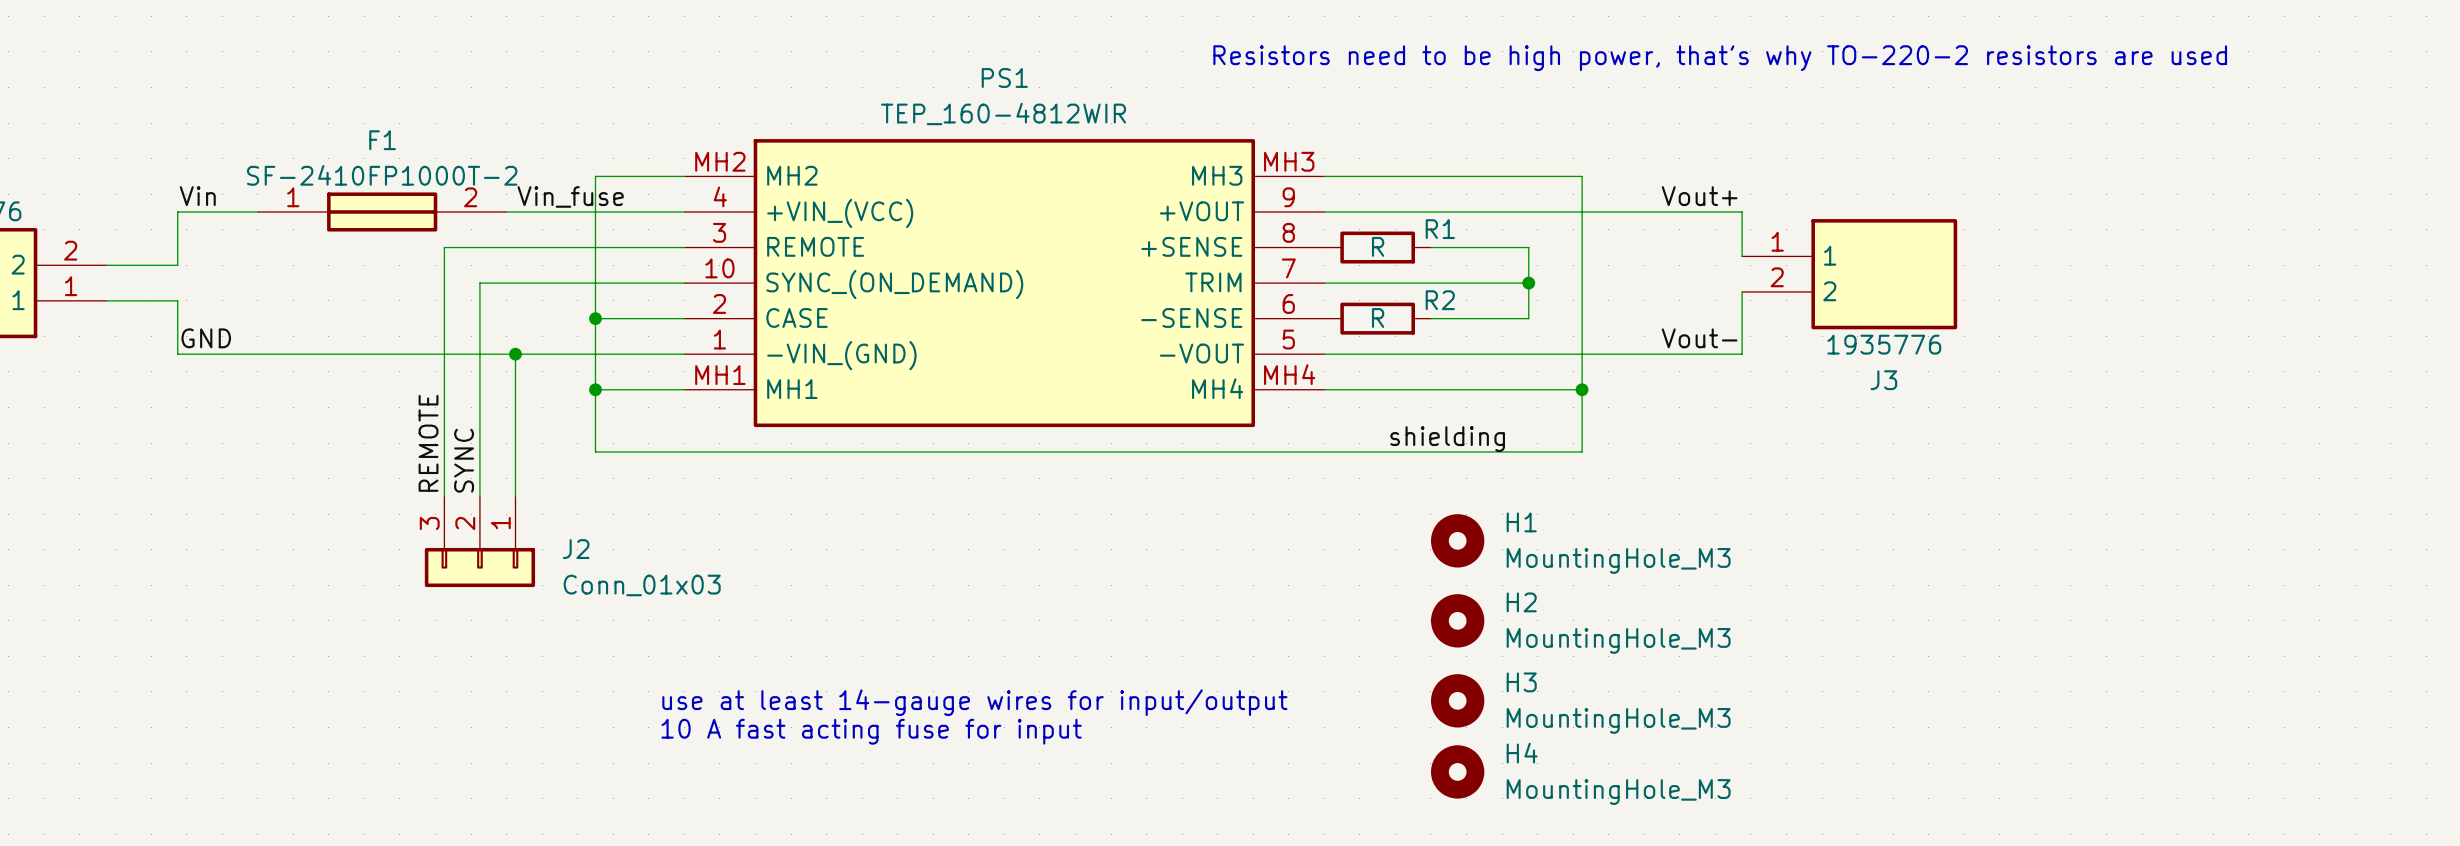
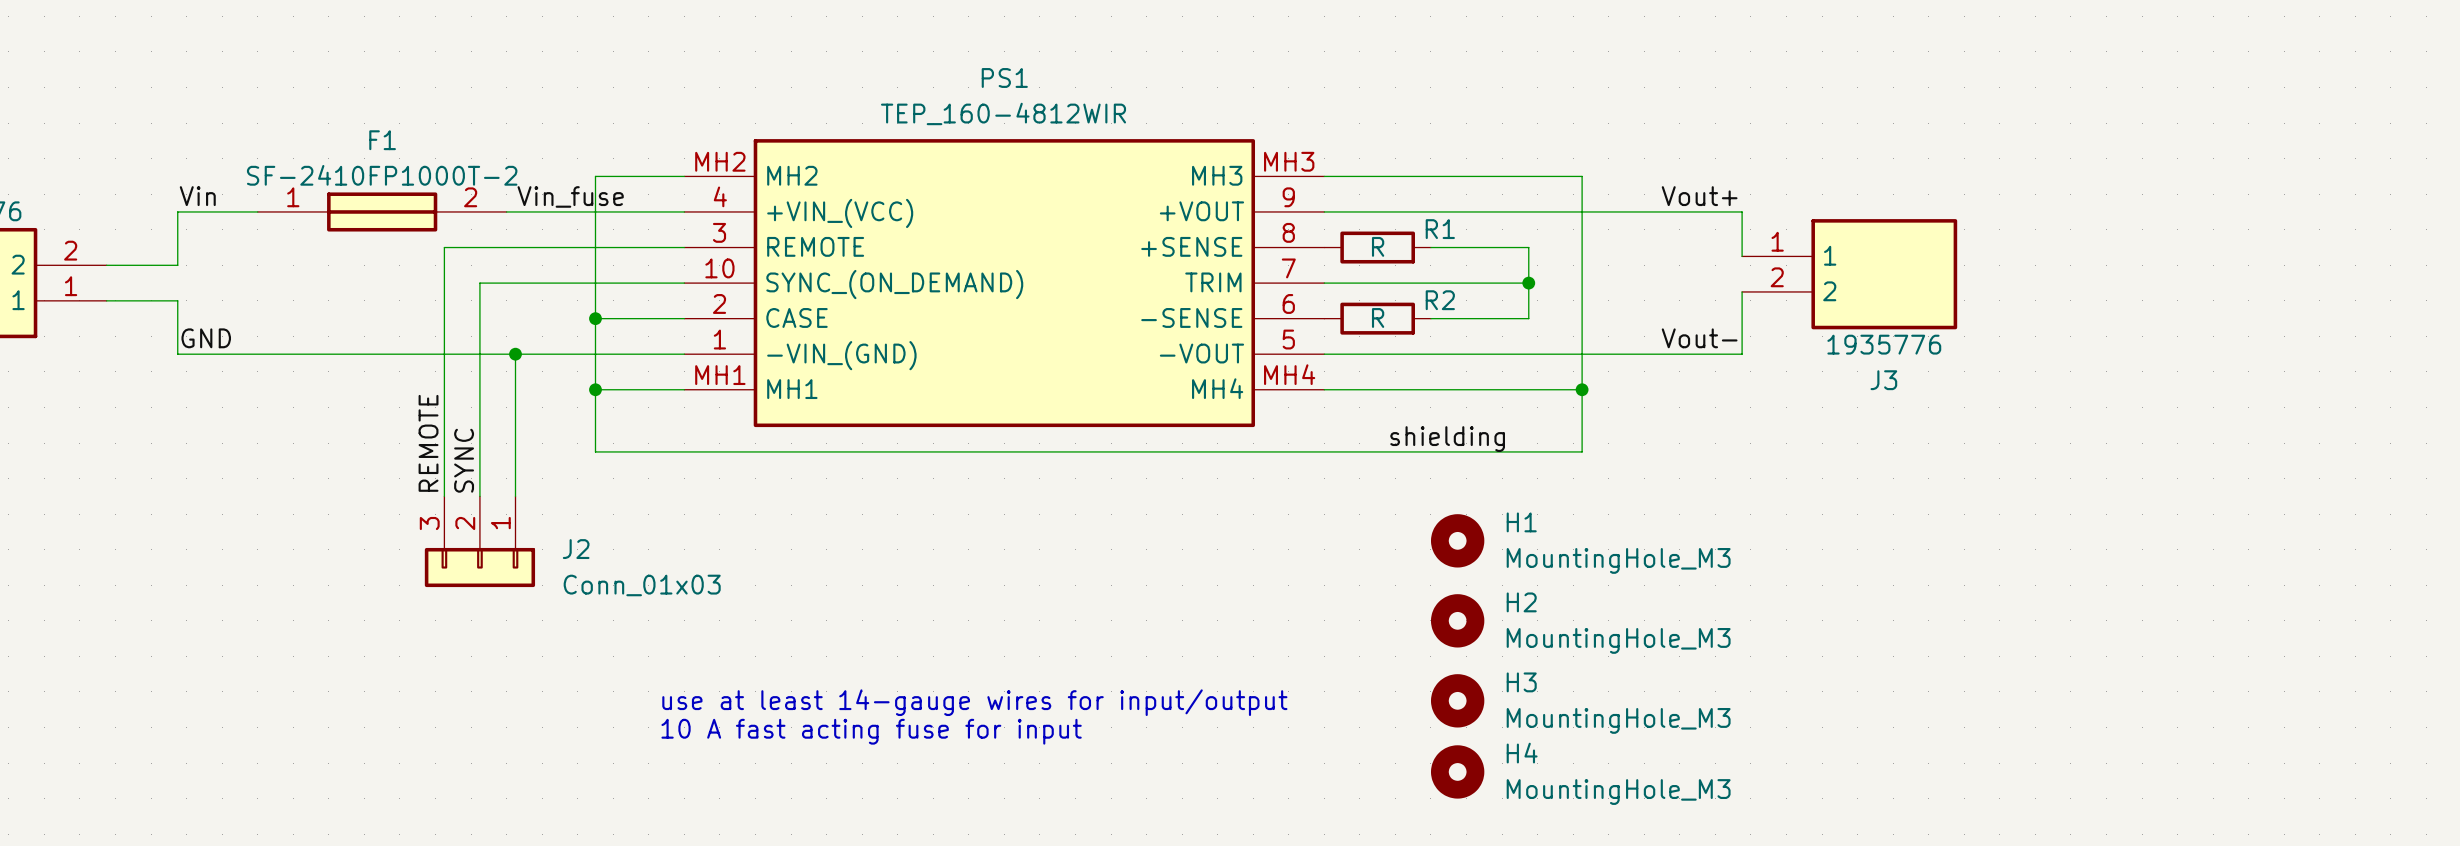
text: Resistors need to be high power, that's why TO-220-2 resistors are used (1720, 58) -> none

